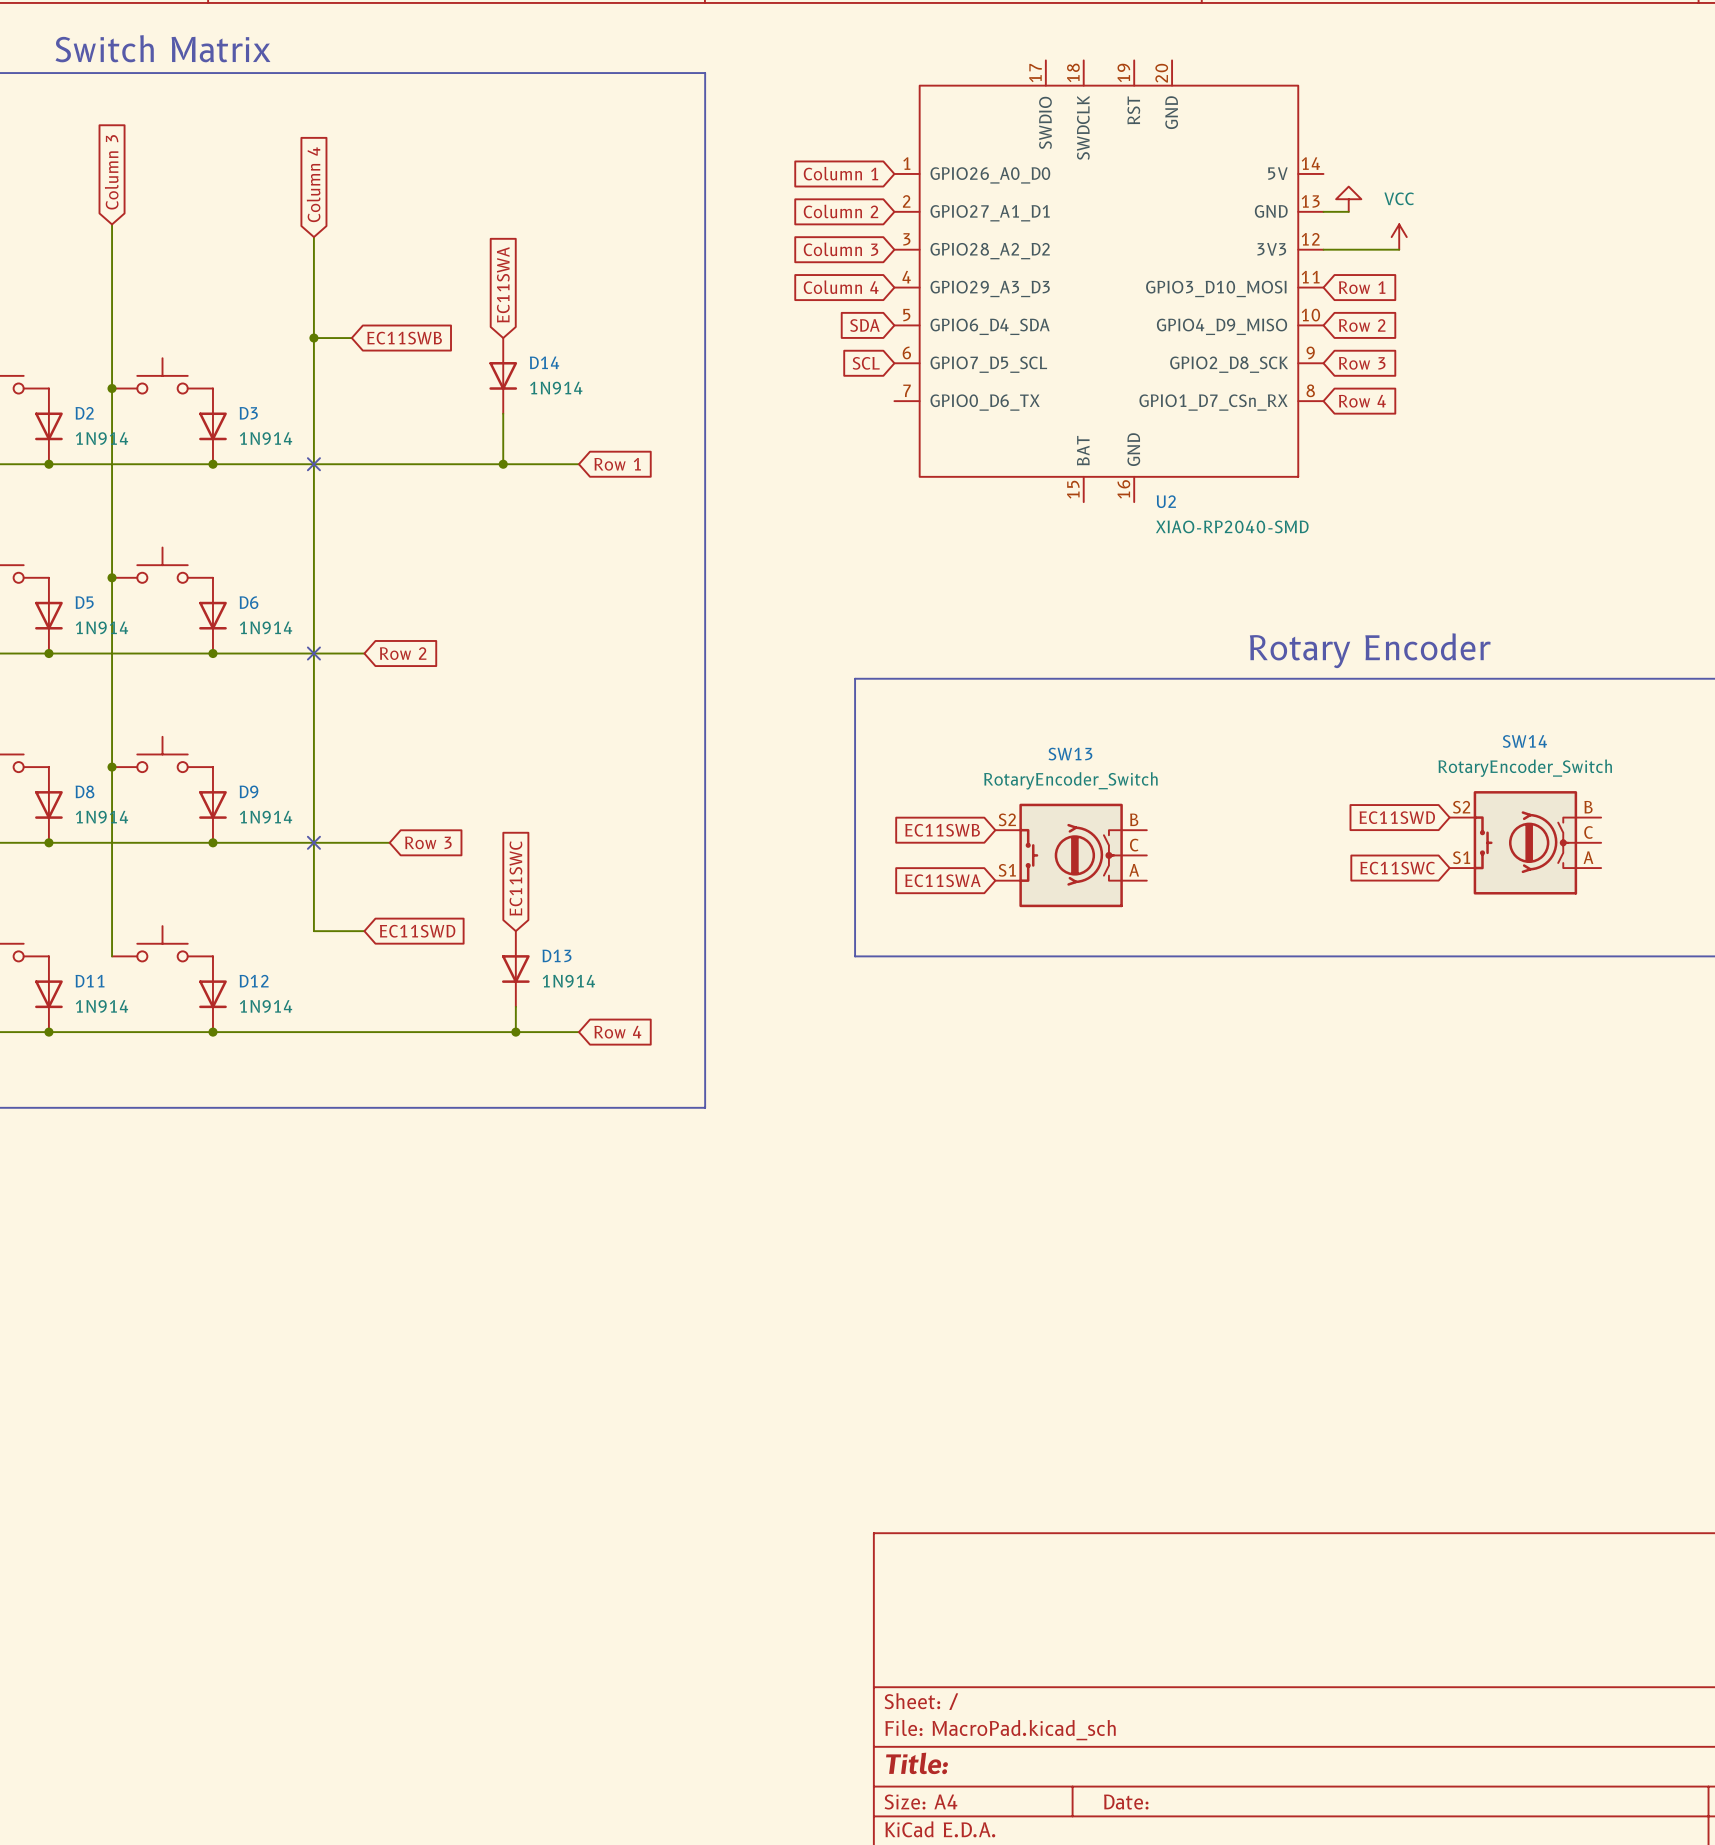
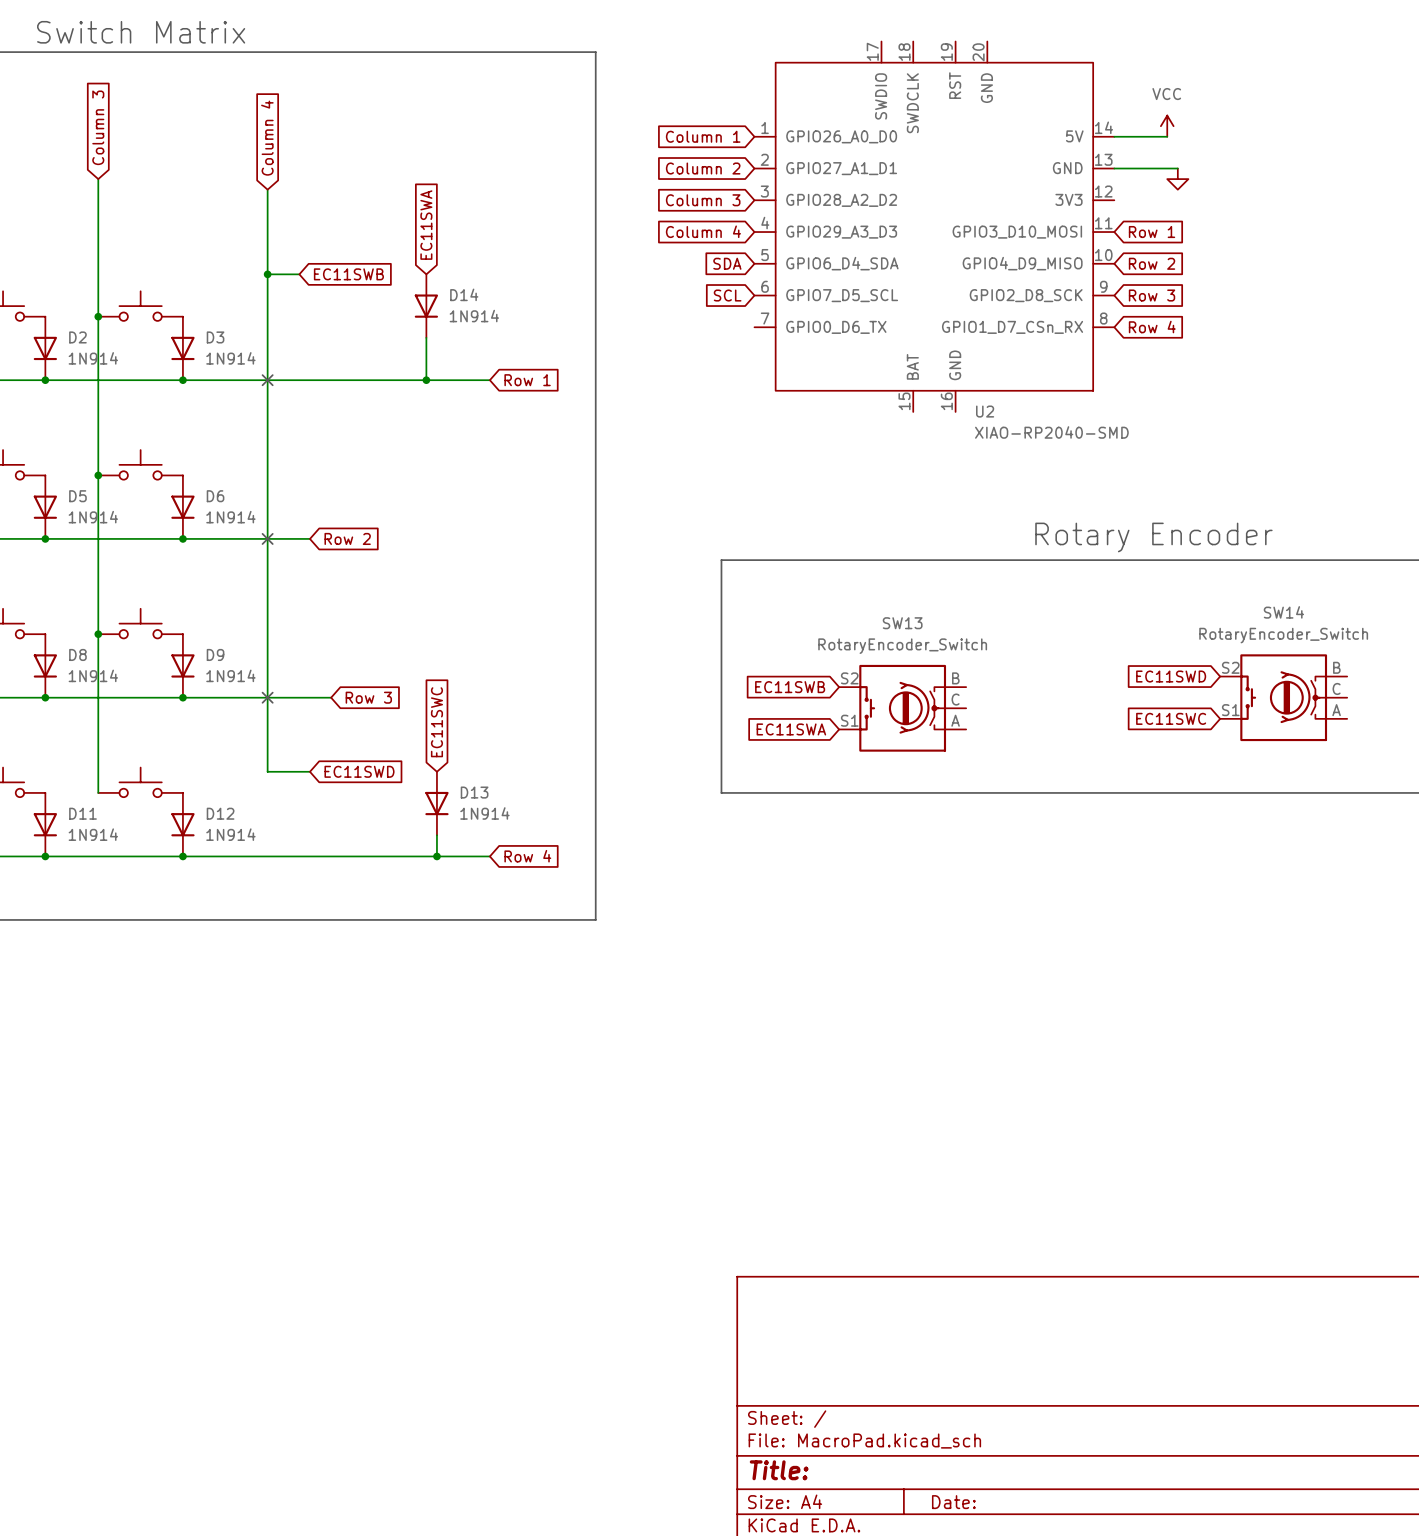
wire: none -> (1114, 136) (1167, 136)
power symbol rotation: 0° (1348, 199) -> 180° (1177, 179)
power symbol position: (1348, 199) -> (1177, 179)
wire: none -> (1135, 168) (1177, 168)
power symbol position: VCC (1399, 237) -> VCC (1167, 126)
wire: (1323, 249) (1399, 249) -> none

